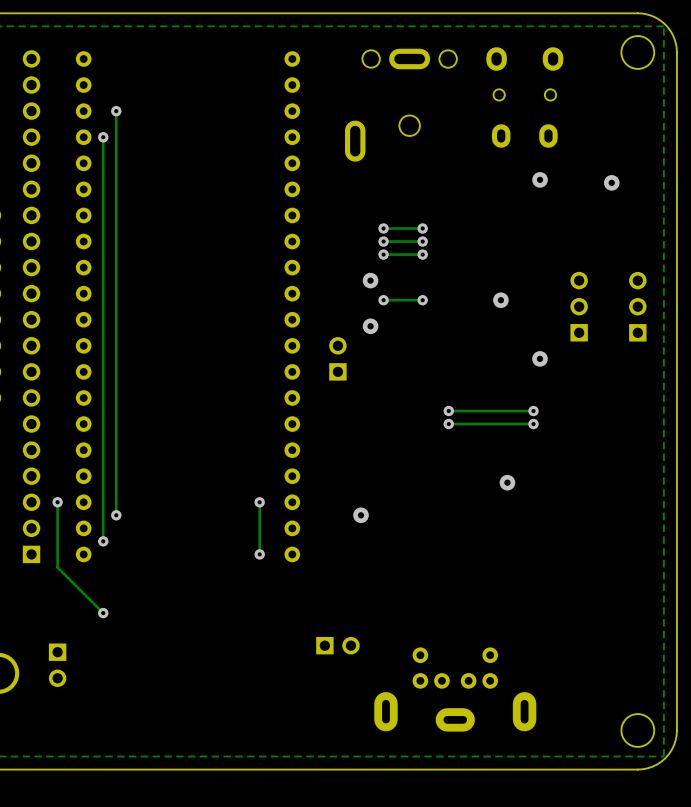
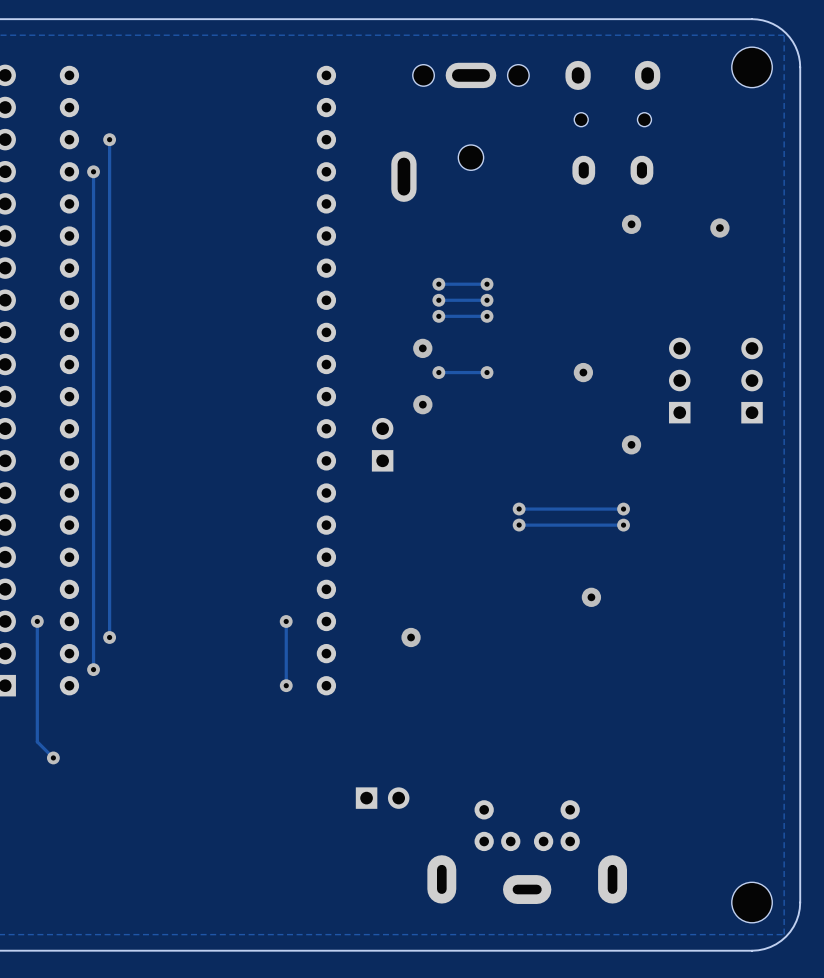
track: (57, 567) (103, 613) -> (37, 701) (37, 741) (53, 757)
via position: (103, 613) -> (53, 757)
part: (57, 665) -> none

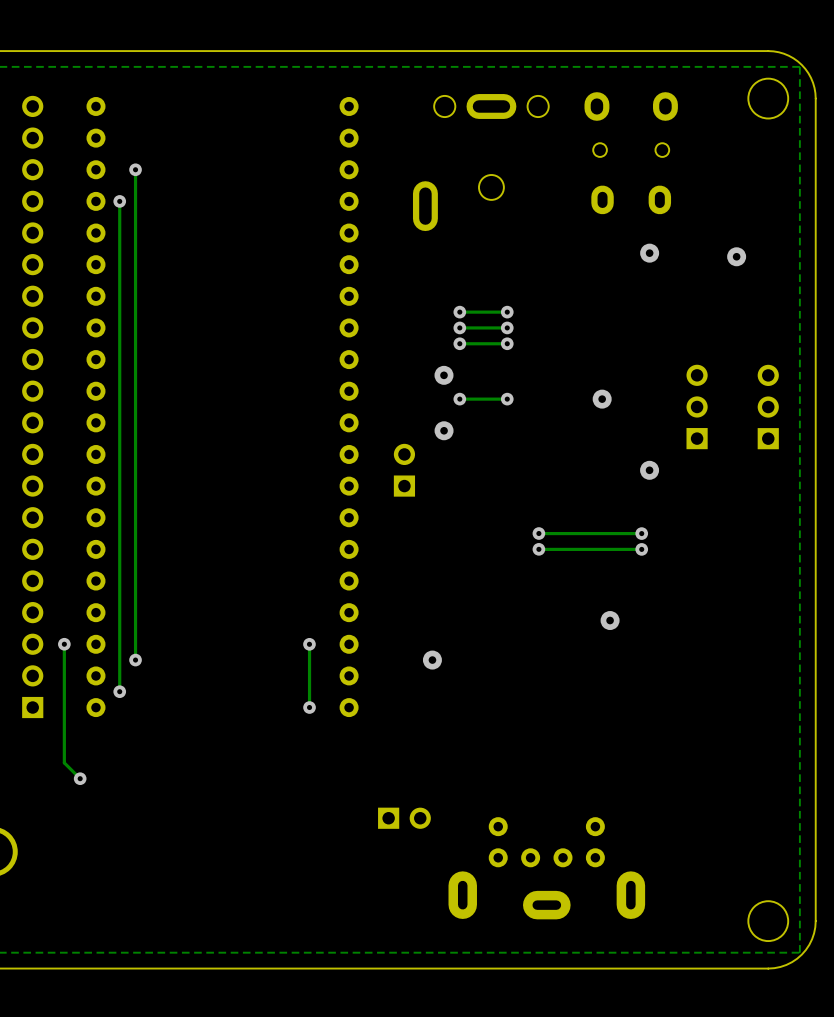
part footprint: [427, 800, 627, 904] -> [448, 817, 646, 920]

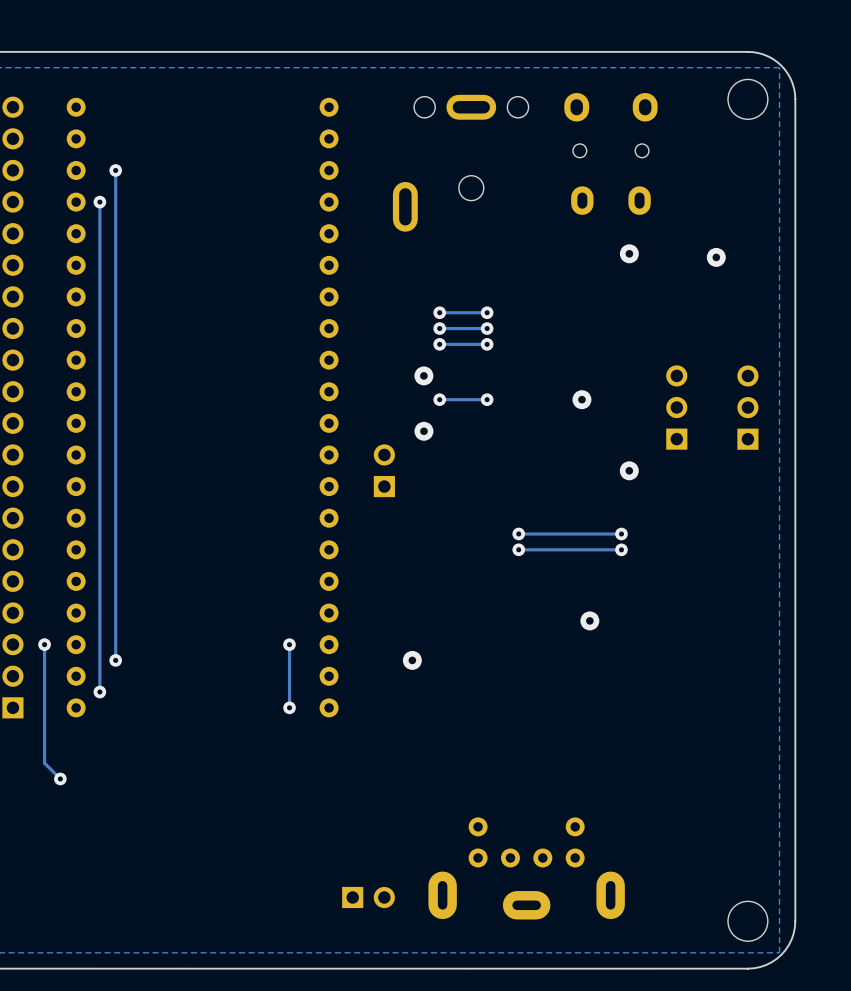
part position: (404, 818) -> (368, 897)

